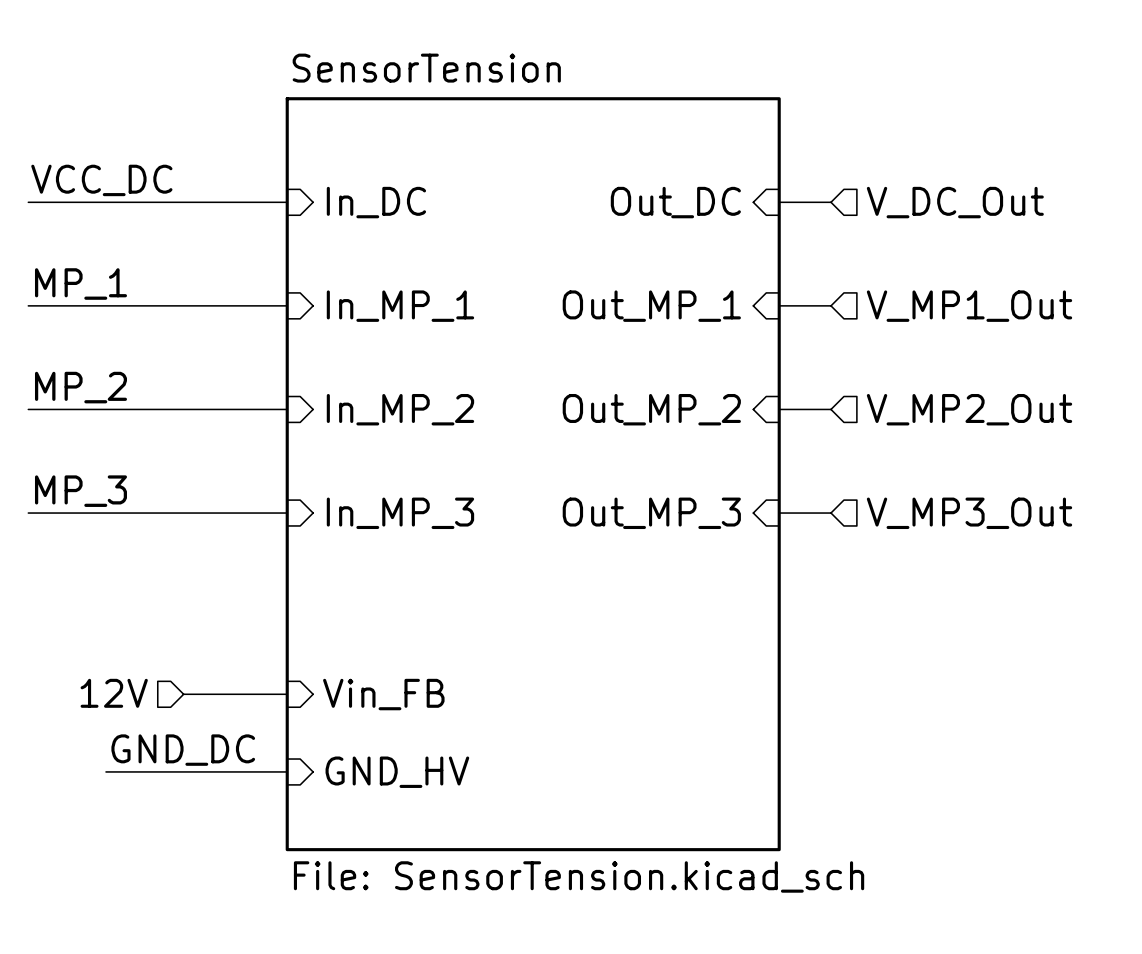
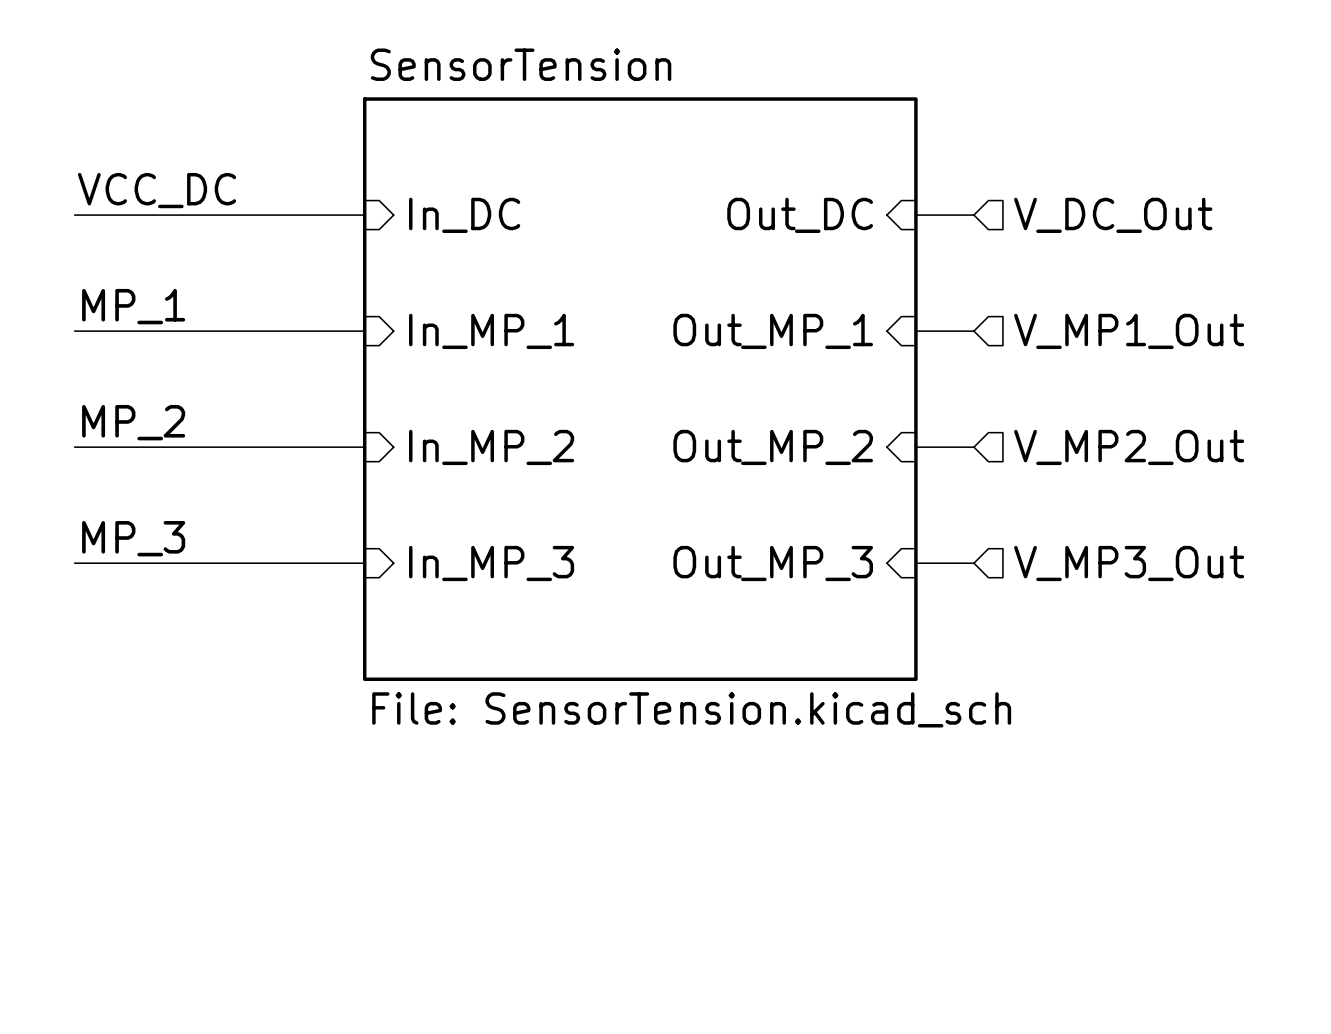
sheet SensorTension: none -> File: SensorTension.kicad_sch (640, 389)
sheet SensorTension: File: SensorTension.kicad_sch (533, 474) -> none
hierarchical label: 12V (114, 693) -> none
wire: (183, 694) (287, 694) -> none
sheet pin: Vin_FB (383, 694) -> none
label: GND_DC (183, 750) -> none
wire: (105, 771) (287, 771) -> none
sheet pin: GND_HV (397, 772) -> none

